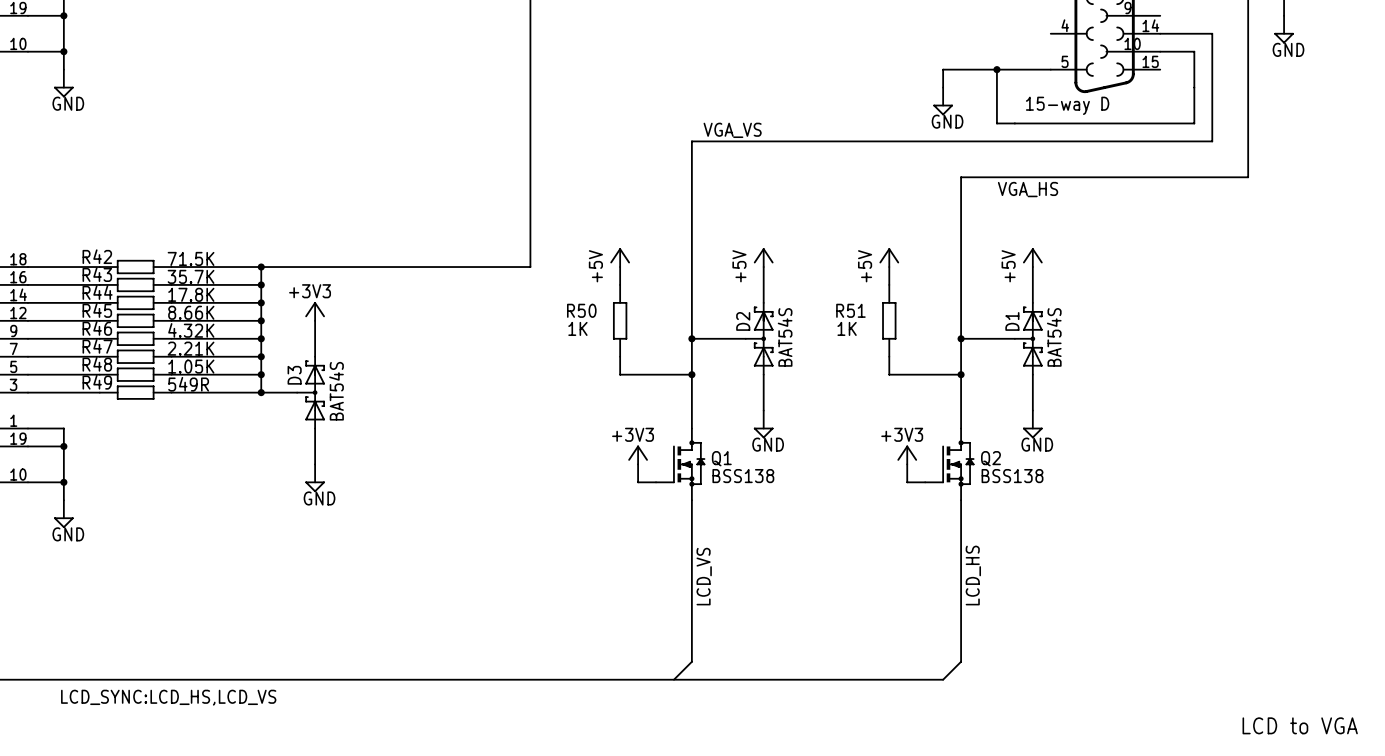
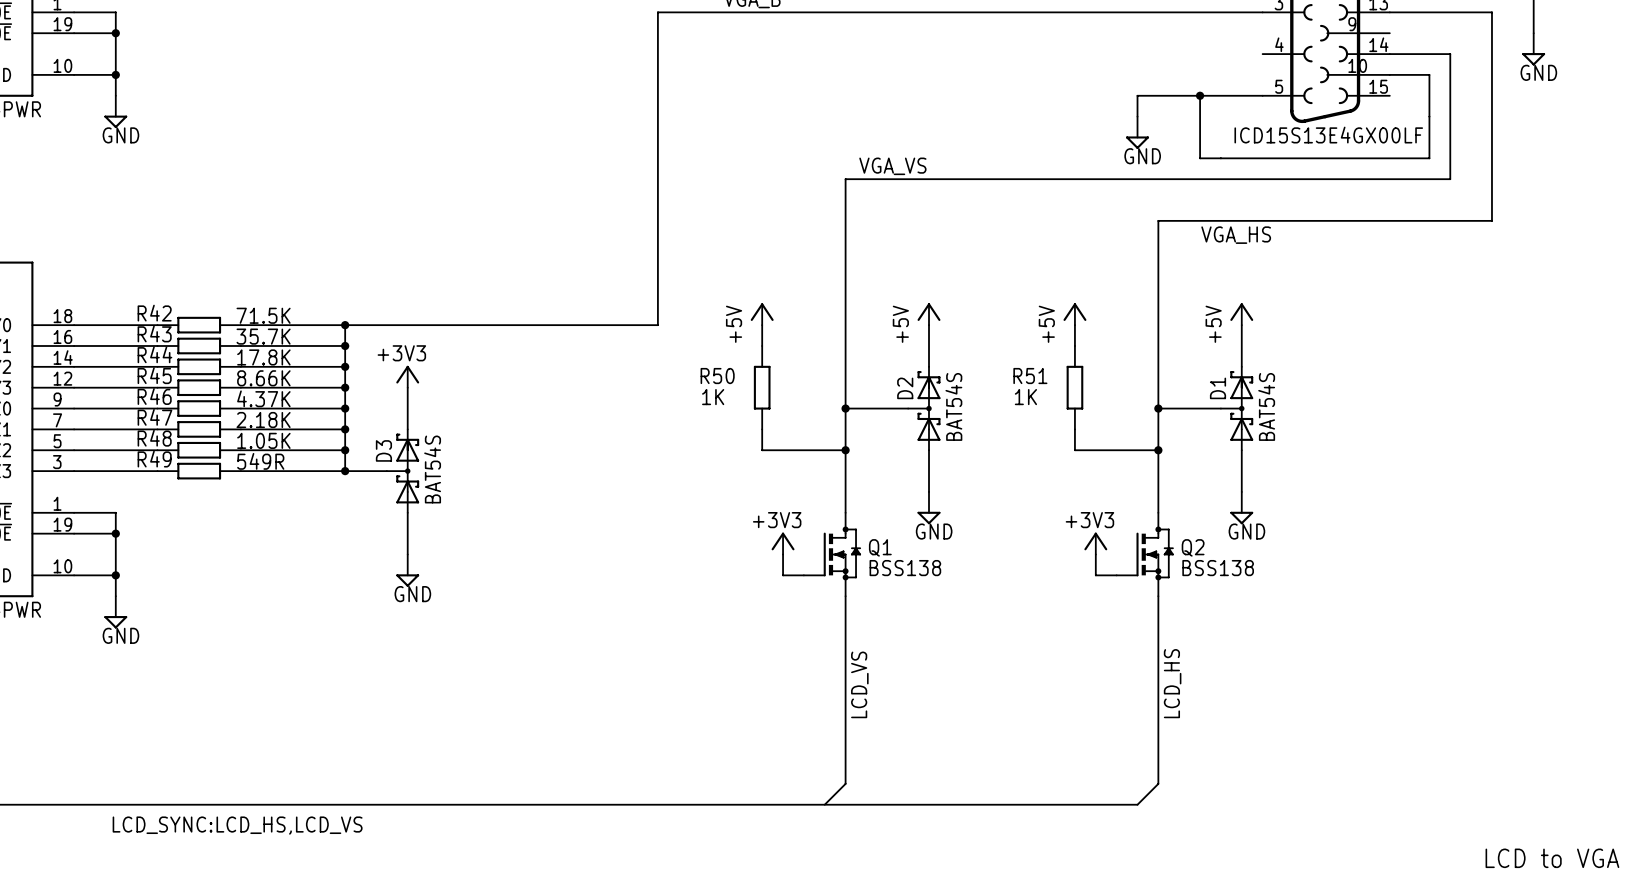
part value: 15-way D (1067, 105) -> ICD15S13E4GX00LF (1328, 135)
R46 value: 4.32K (191, 330) -> 4.37K (263, 398)
R47 value: 2.21K (191, 348) -> 2.18K (263, 420)

